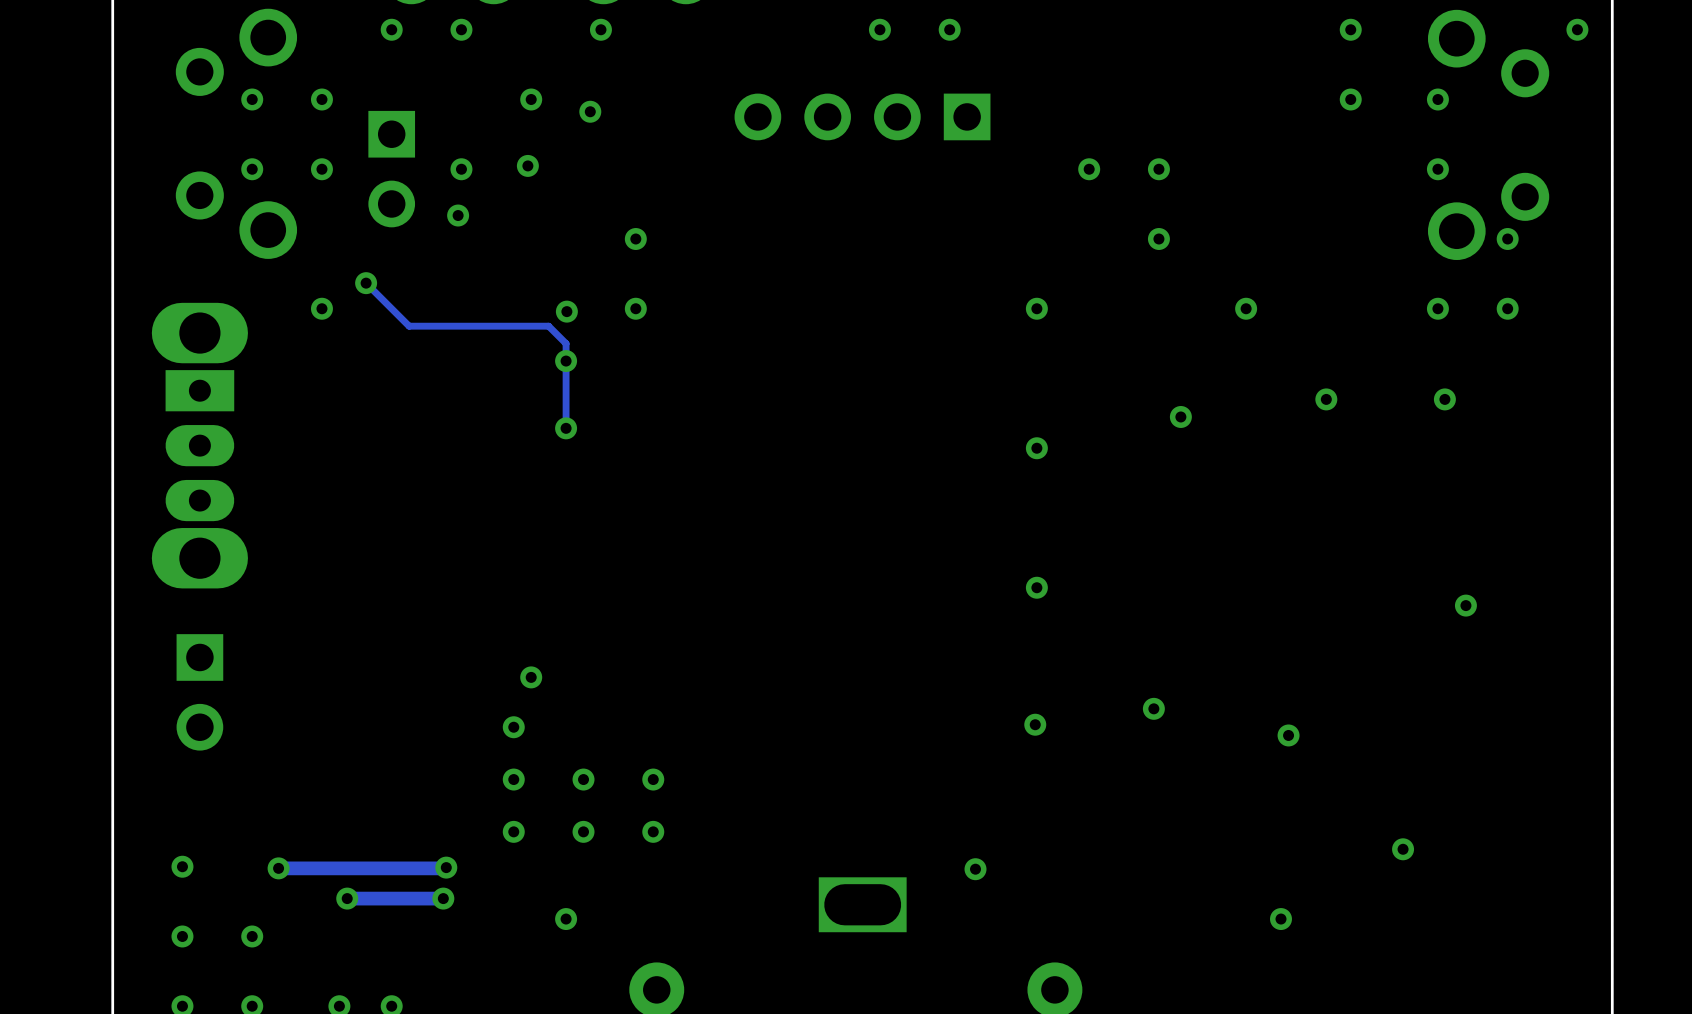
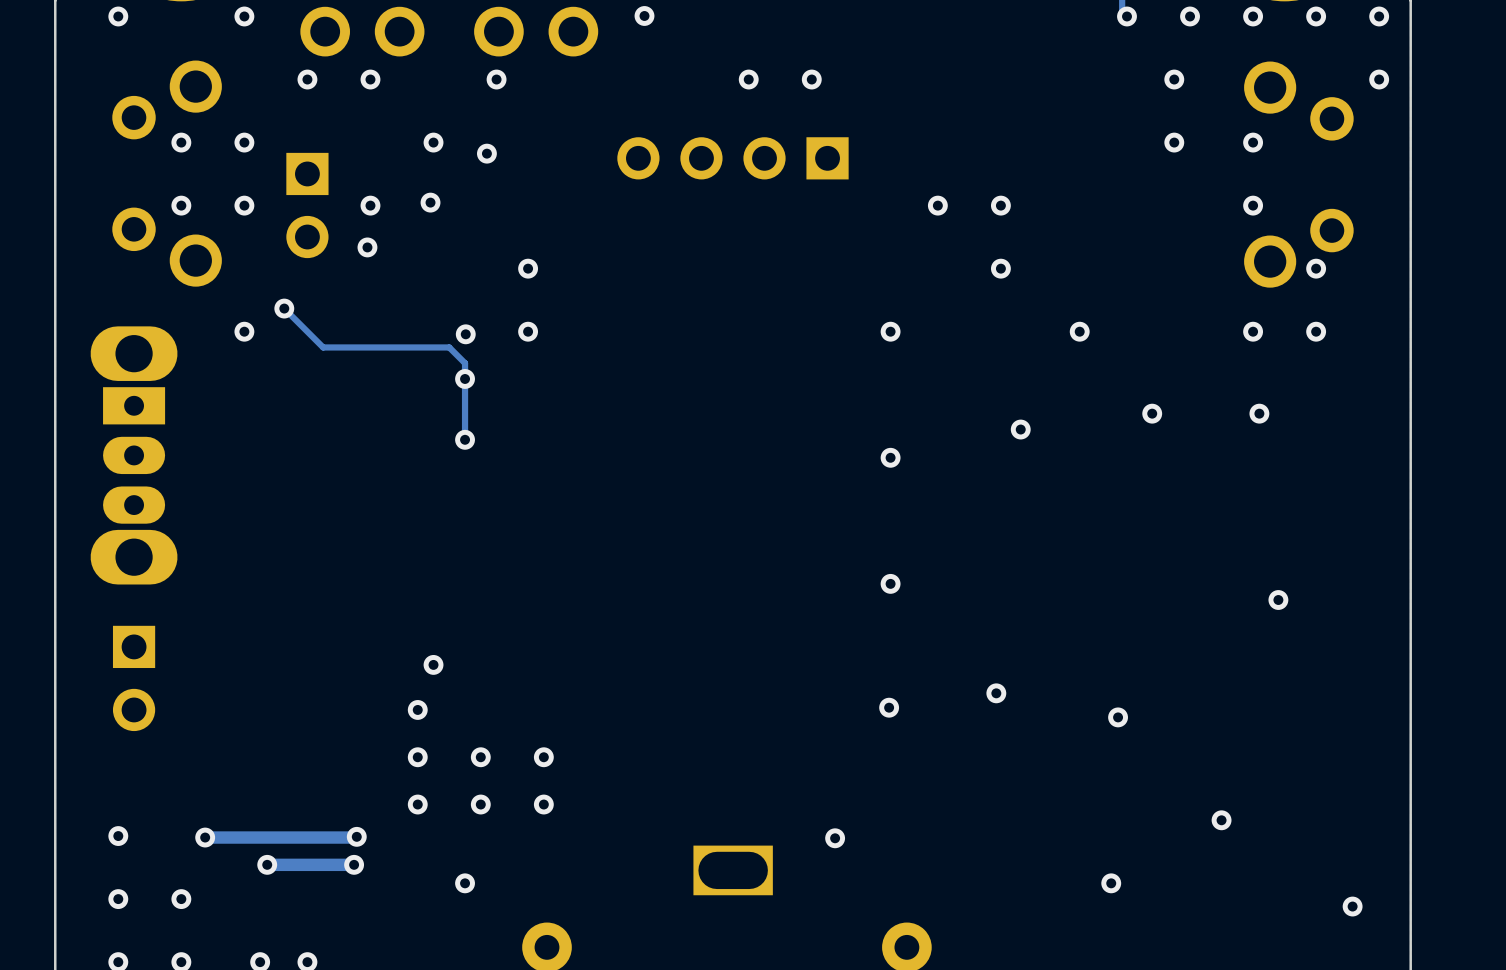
via: none -> (1352, 906)

